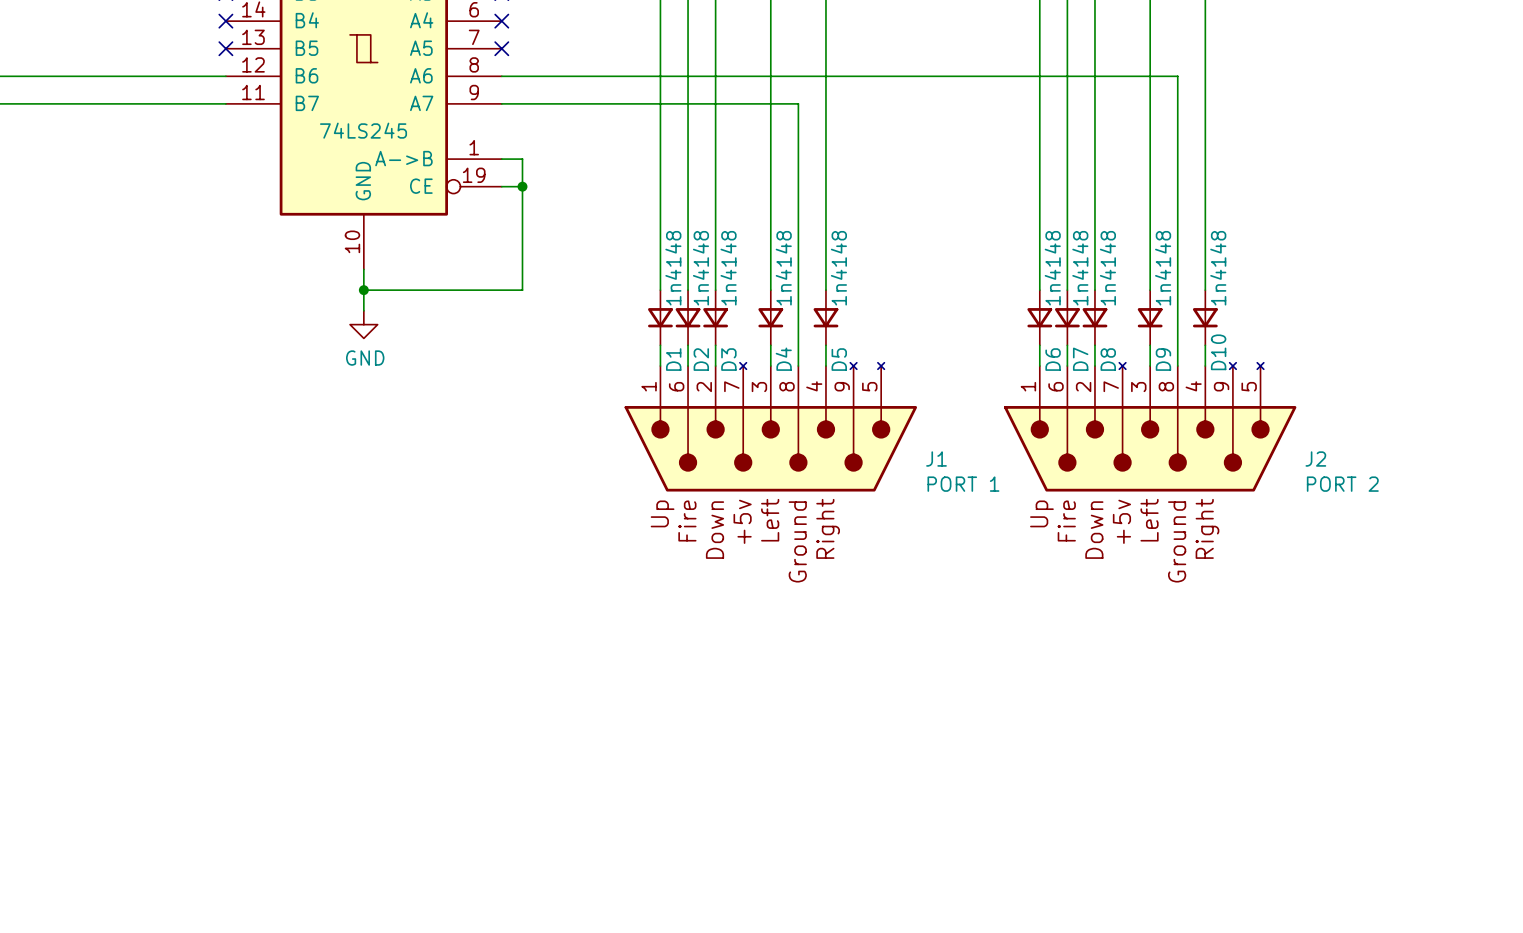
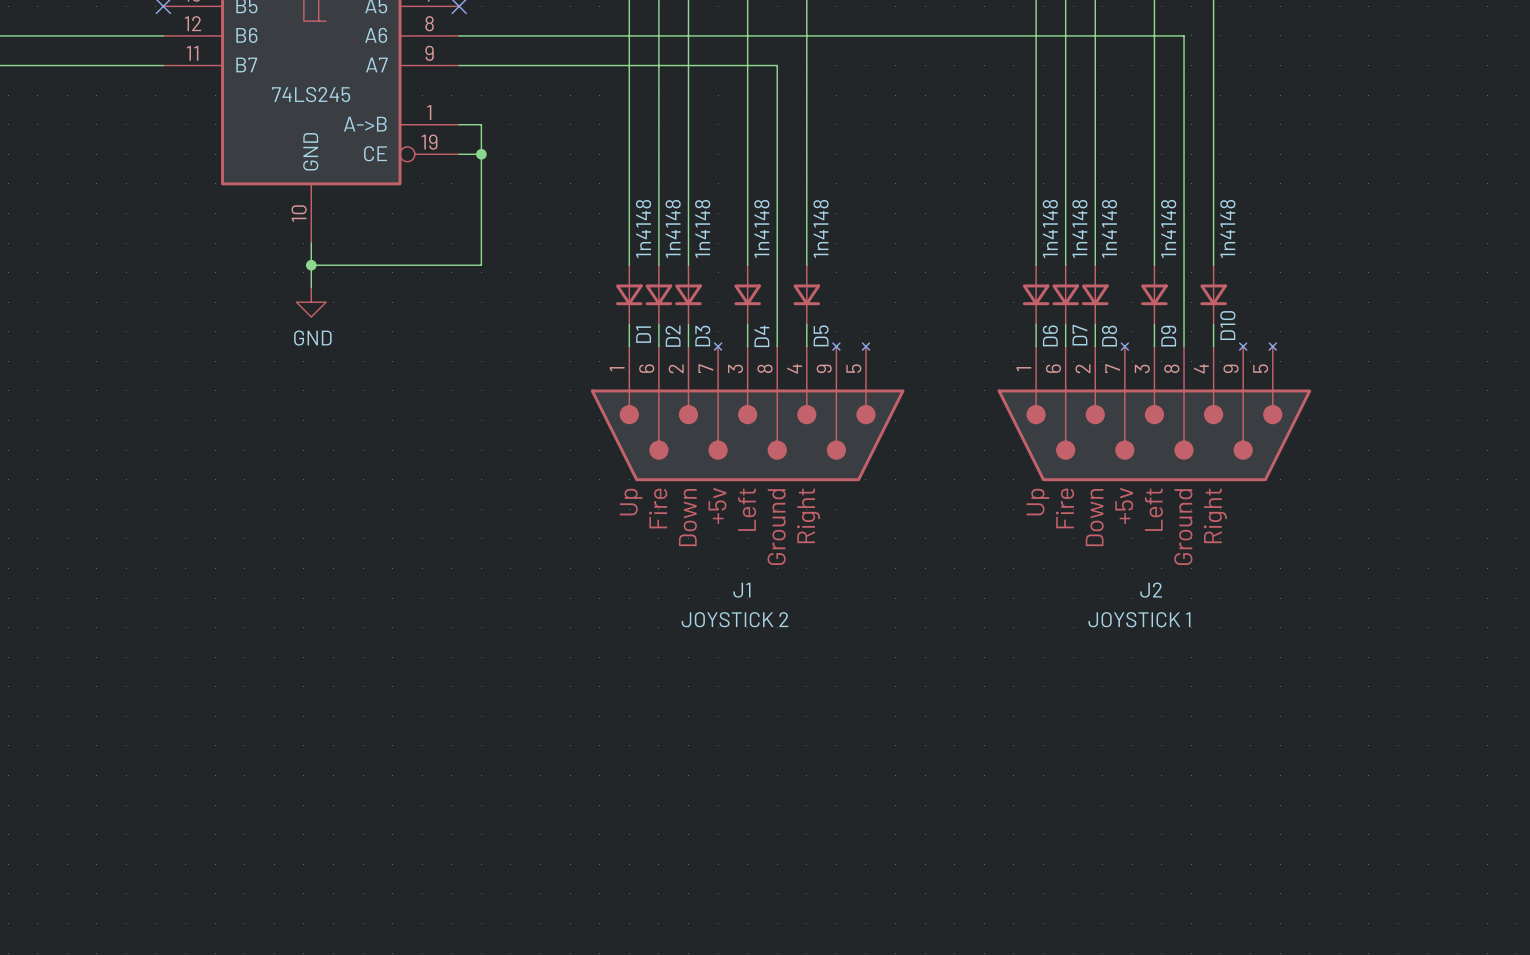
J1 name position: J1 (936, 459) -> J1 (741, 590)
J2 name position: J2 (1315, 459) -> J2 (1151, 590)
J1 value: PORT 1 (963, 484) -> JOYSTICK 2 (735, 619)
J2 value: PORT 2 (1342, 484) -> JOYSTICK 1 (1139, 619)

